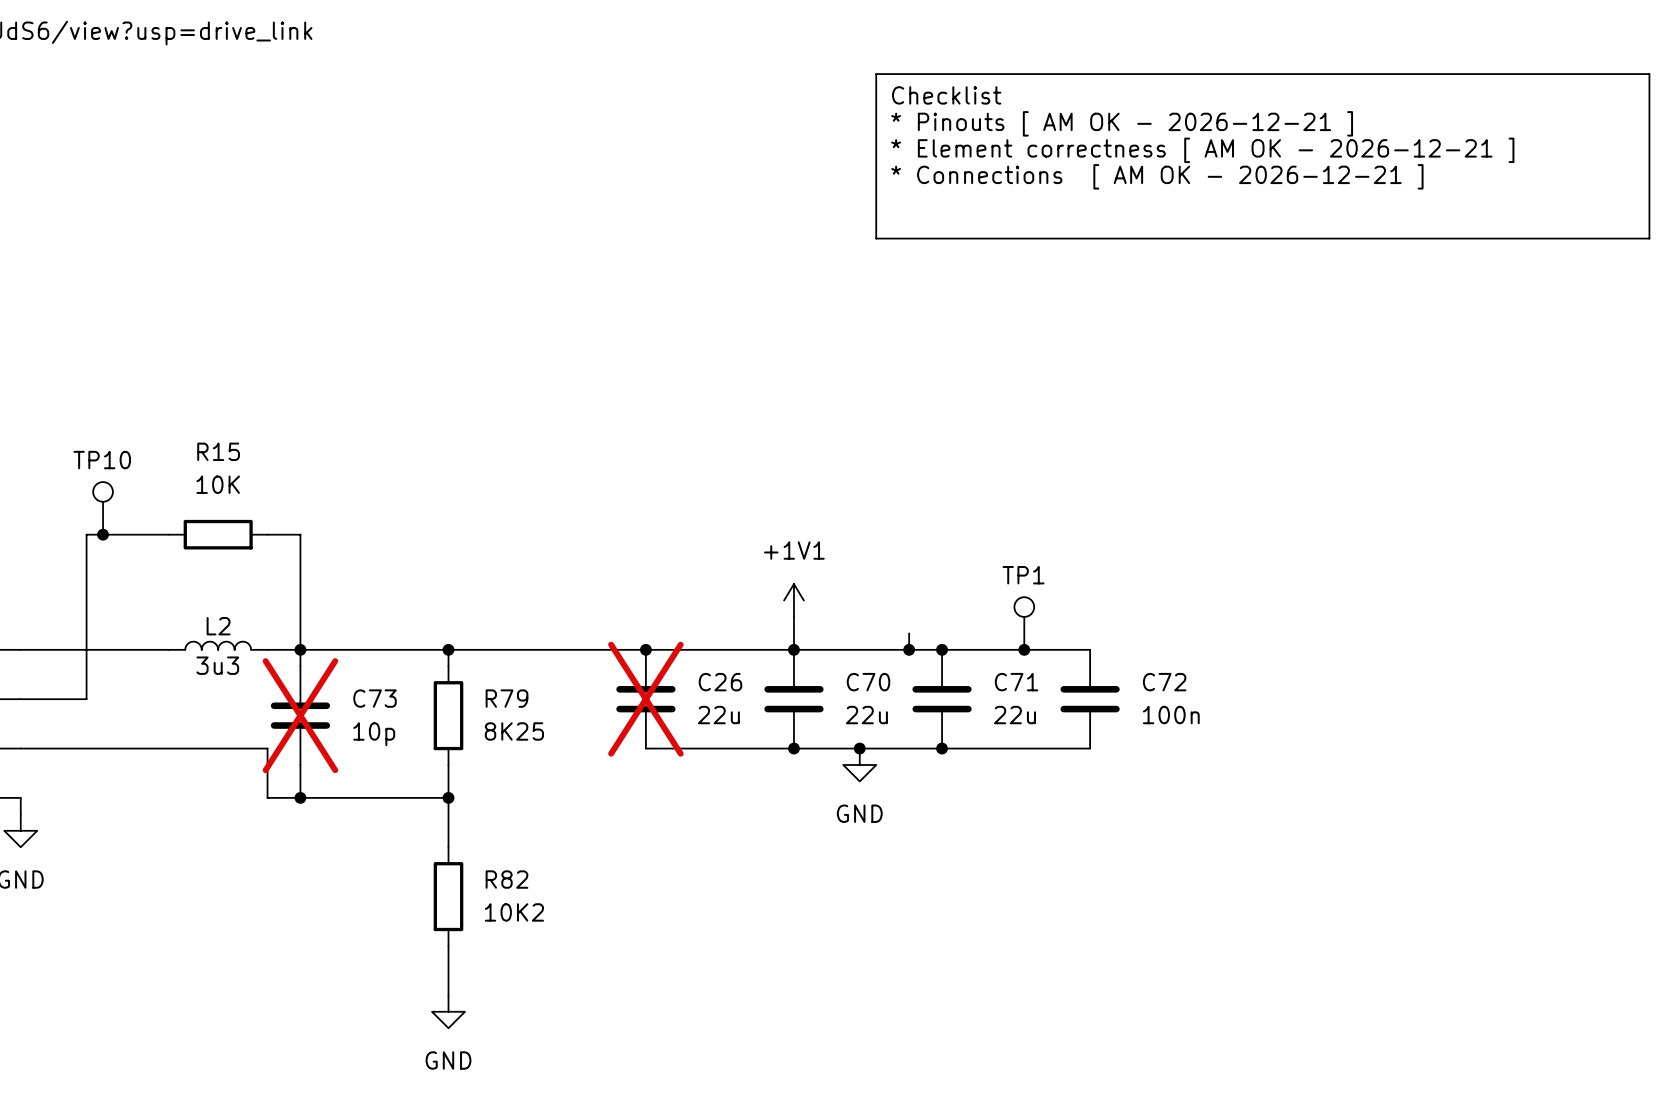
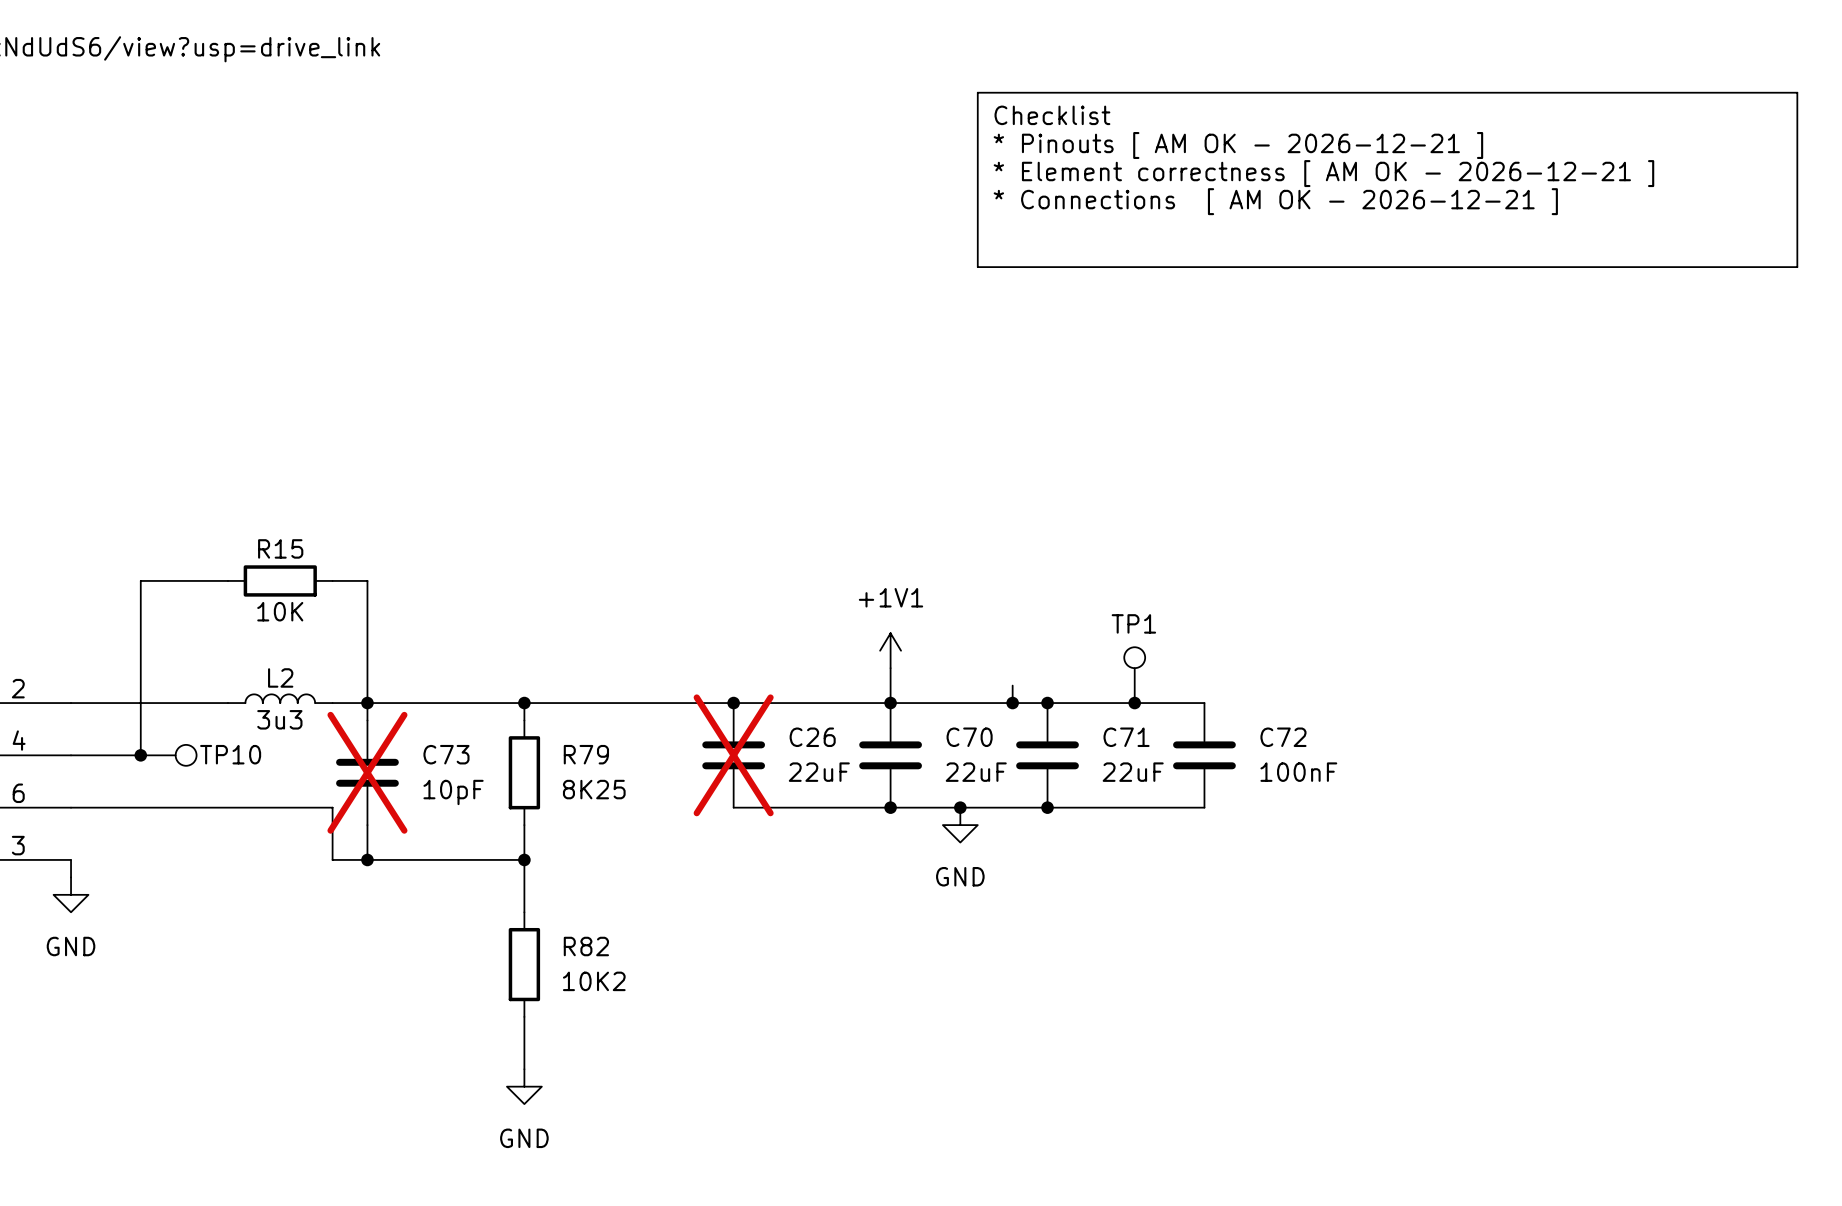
R15 name position: R15 (218, 451) -> R15 (280, 548)
R15 value position: 10K (218, 484) -> 10K (280, 611)
TP10 rotation: 0° (103, 491) -> 90° clockwise (186, 755)
TP10 position: (103, 508) -> (168, 755)
junction: (103, 534) -> none
junction: none -> (140, 755)
C26 value: 22u (718, 715) -> 22uF (819, 772)
C70 value: 22u (866, 715) -> 22uF (976, 772)
C71 value: 22u (1015, 715) -> 22uF (1133, 772)
C72 value: 100n (1171, 715) -> 100nF (1298, 772)
C73 value: 10p (374, 734) -> 10pF (453, 792)

